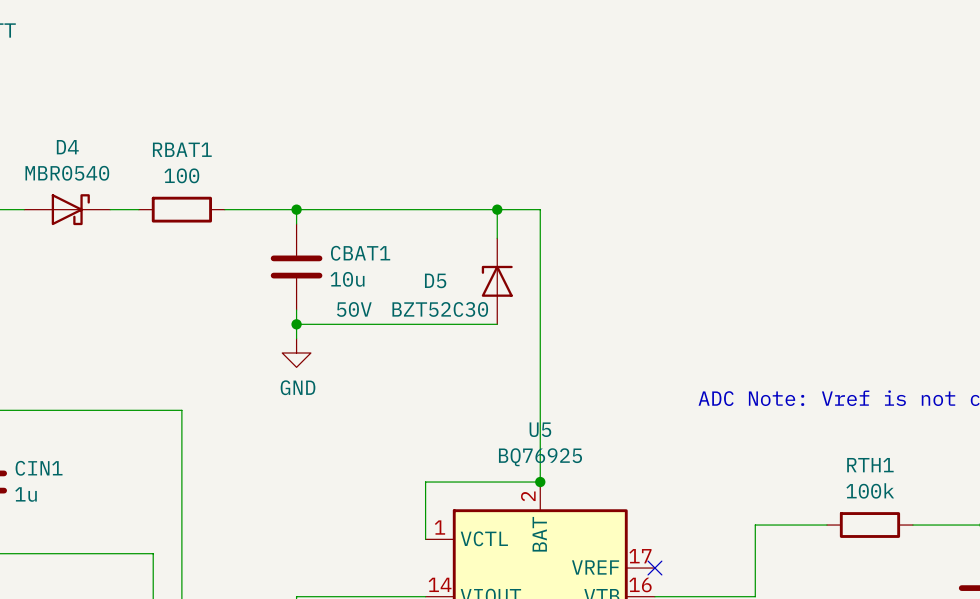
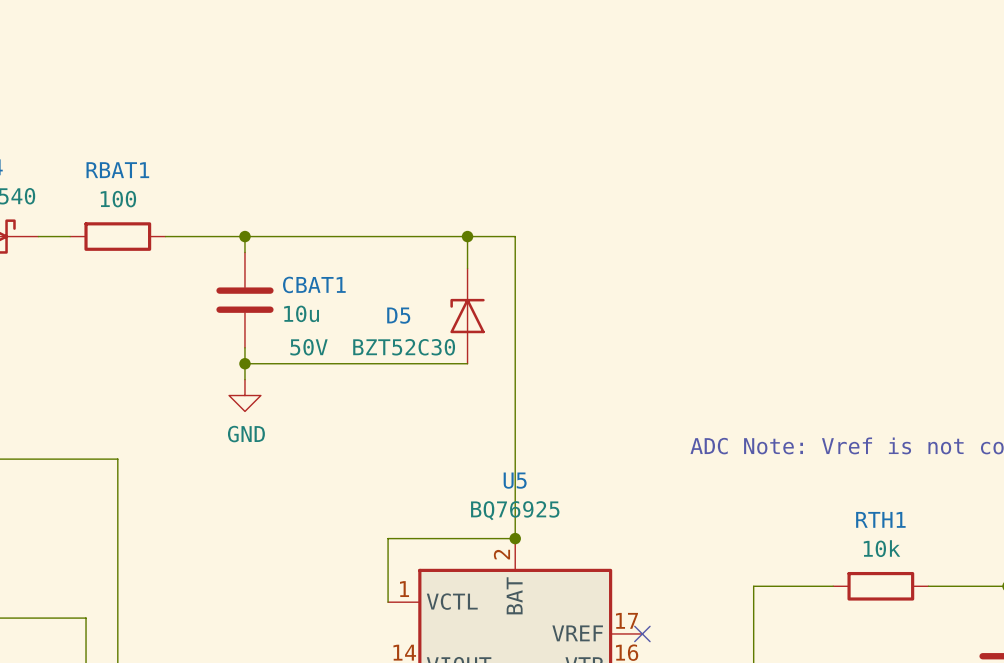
RTH1 value: 100k (870, 490) -> 10k (881, 548)

